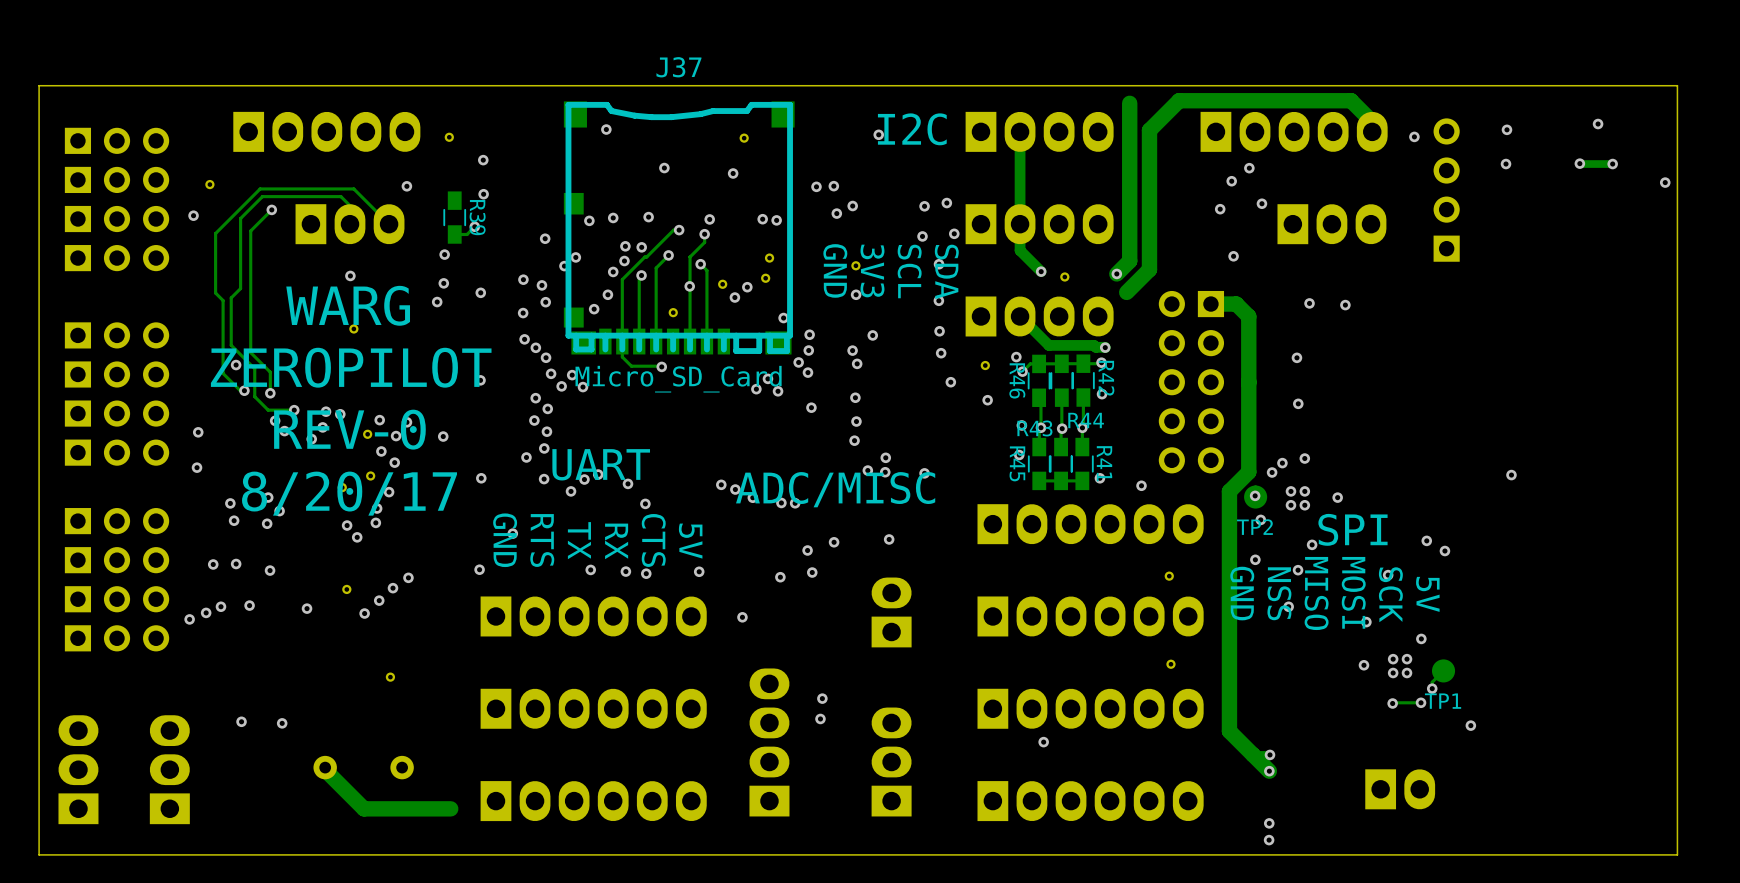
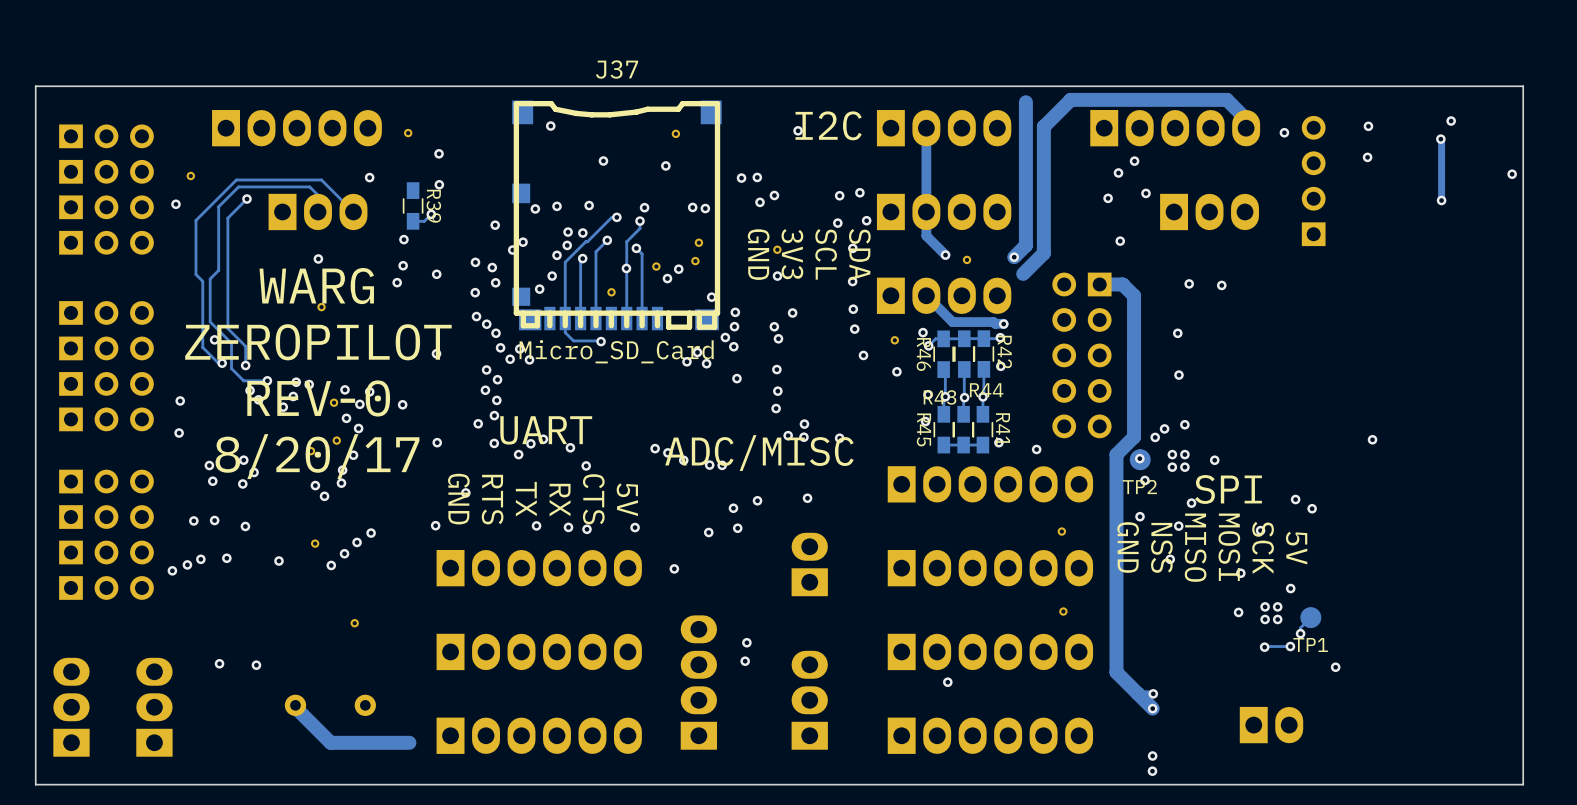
track: none -> (1440, 139) (1441, 200)
via: none -> (1440, 139)
track: (1579, 163) (1612, 164) -> none
via: (1579, 163) -> none
via: (1612, 164) -> none
via: none -> (1441, 200)

